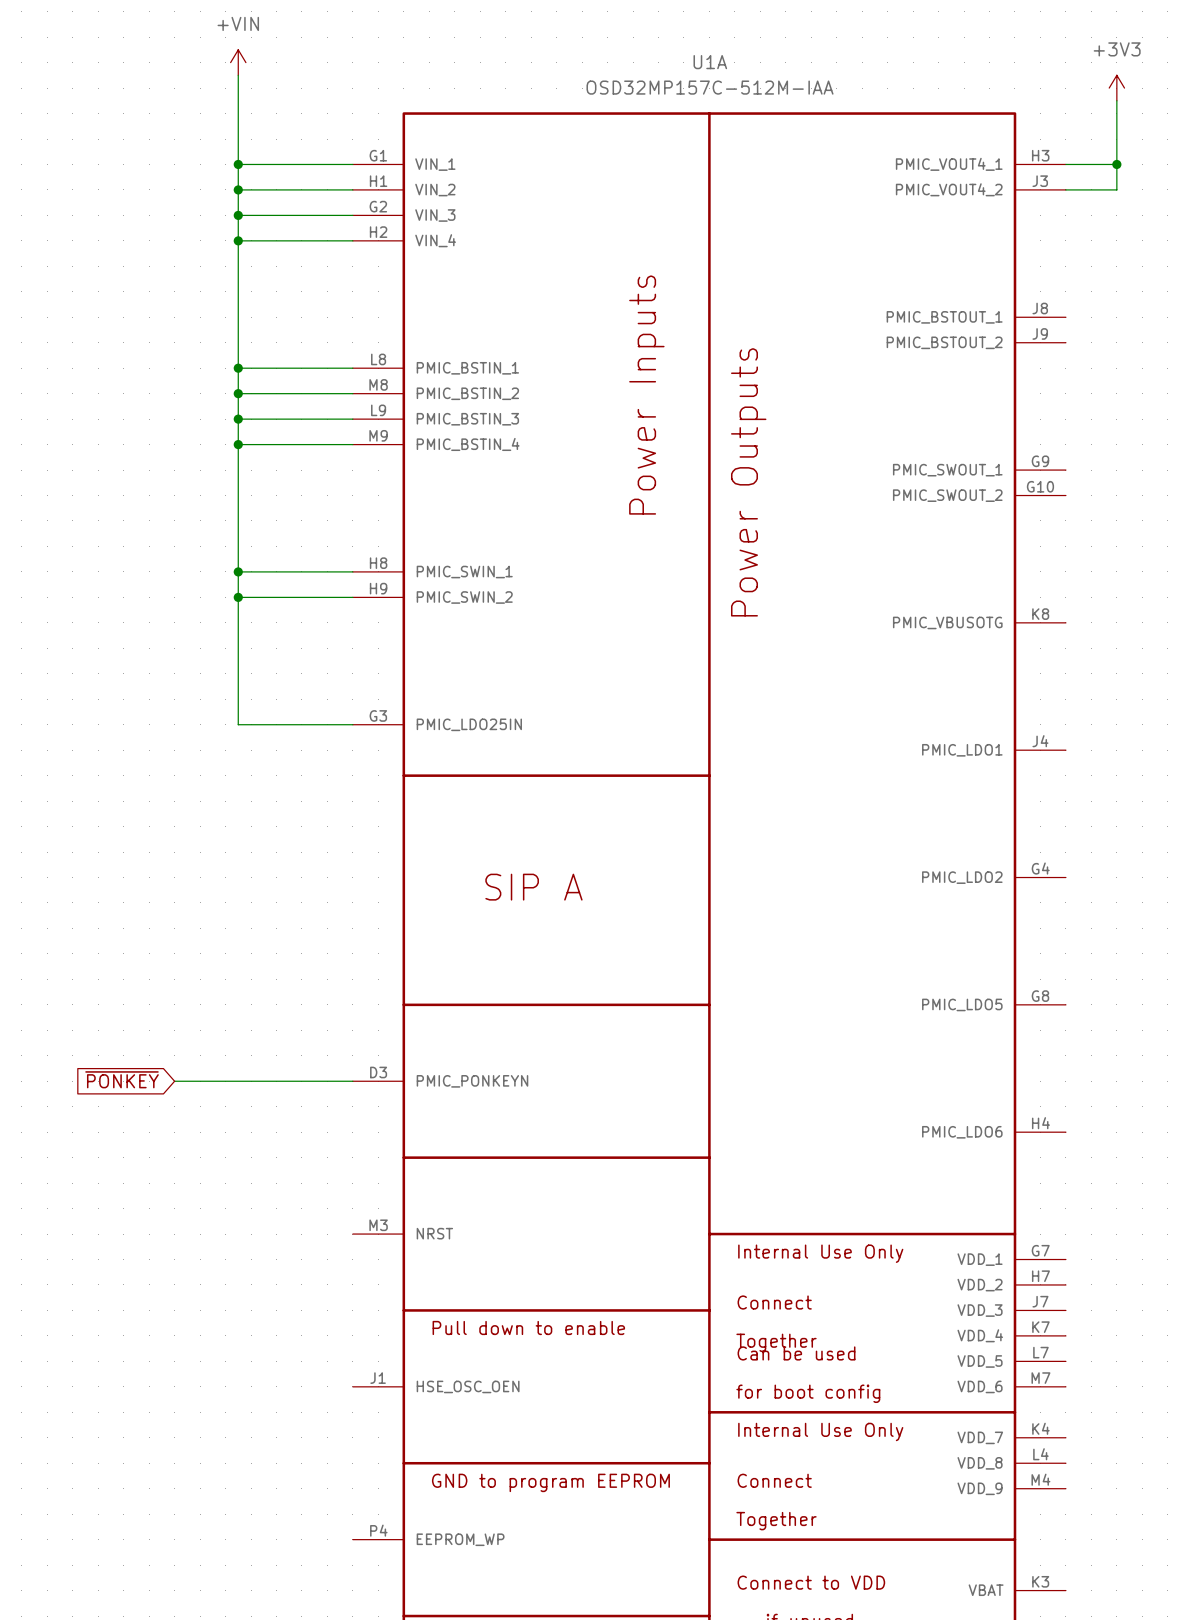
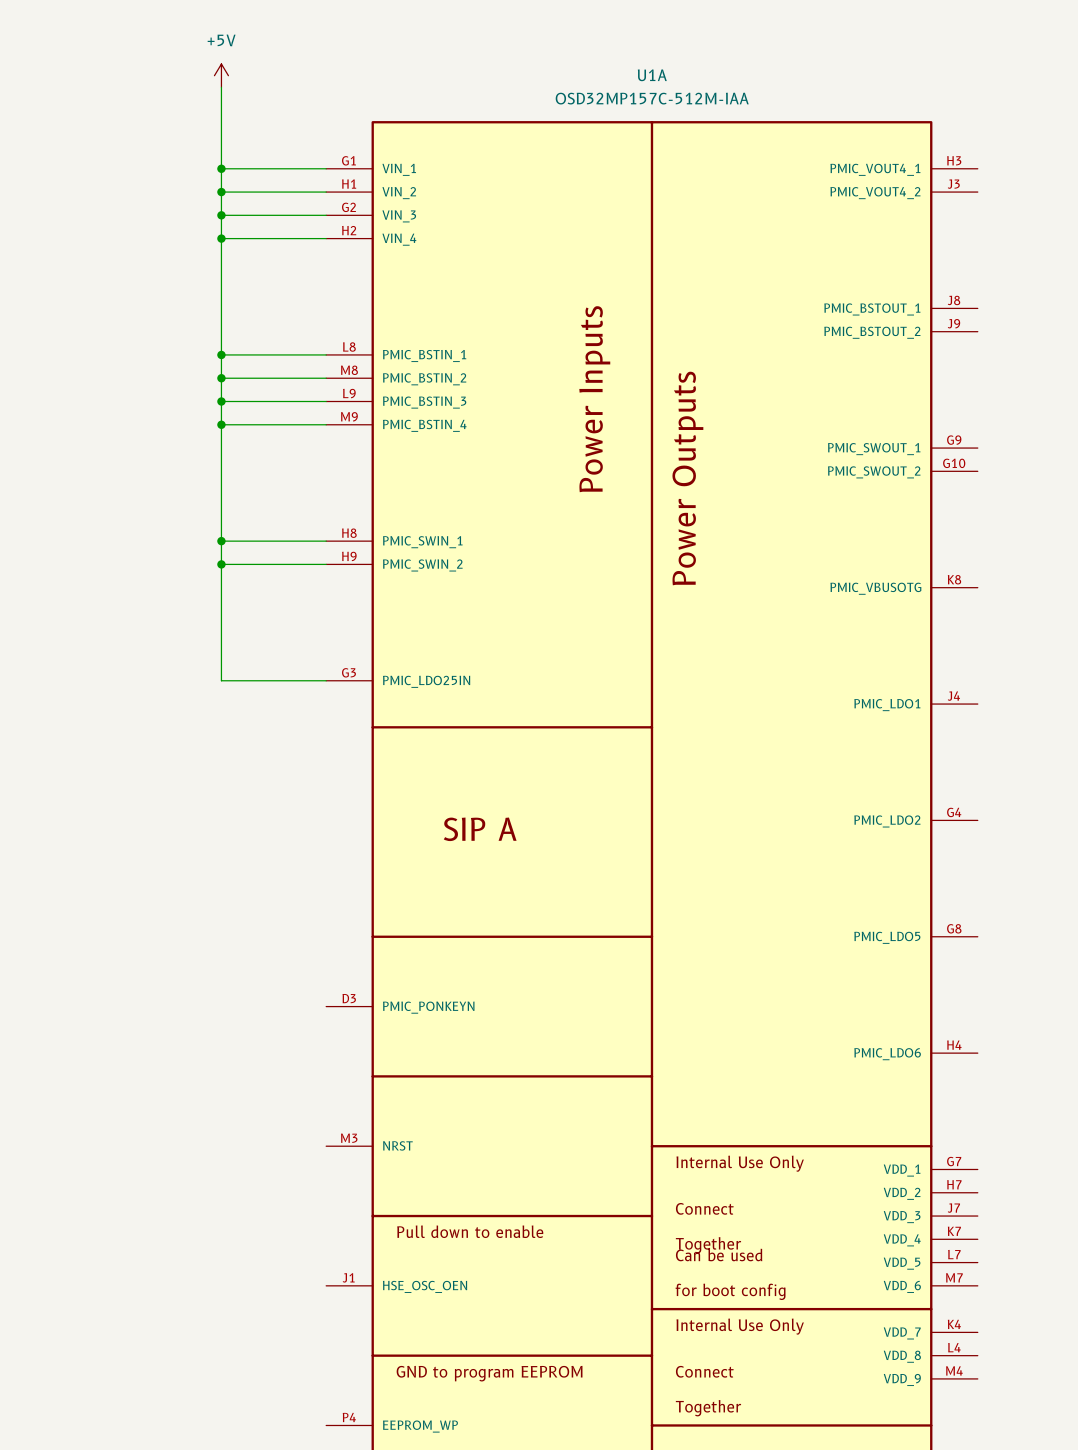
power symbol: +VIN (238, 62) -> +5V (221, 75)
power symbol: +3V3 (1116, 88) -> none
wire: (1116, 100) (1116, 189) (1065, 189) -> none
wire: (1065, 164) (1116, 164) -> none
junction: (1116, 164) -> none
global label: ~{PONKEY} (122, 1079) -> none
wire: (174, 1081) (352, 1081) -> none

